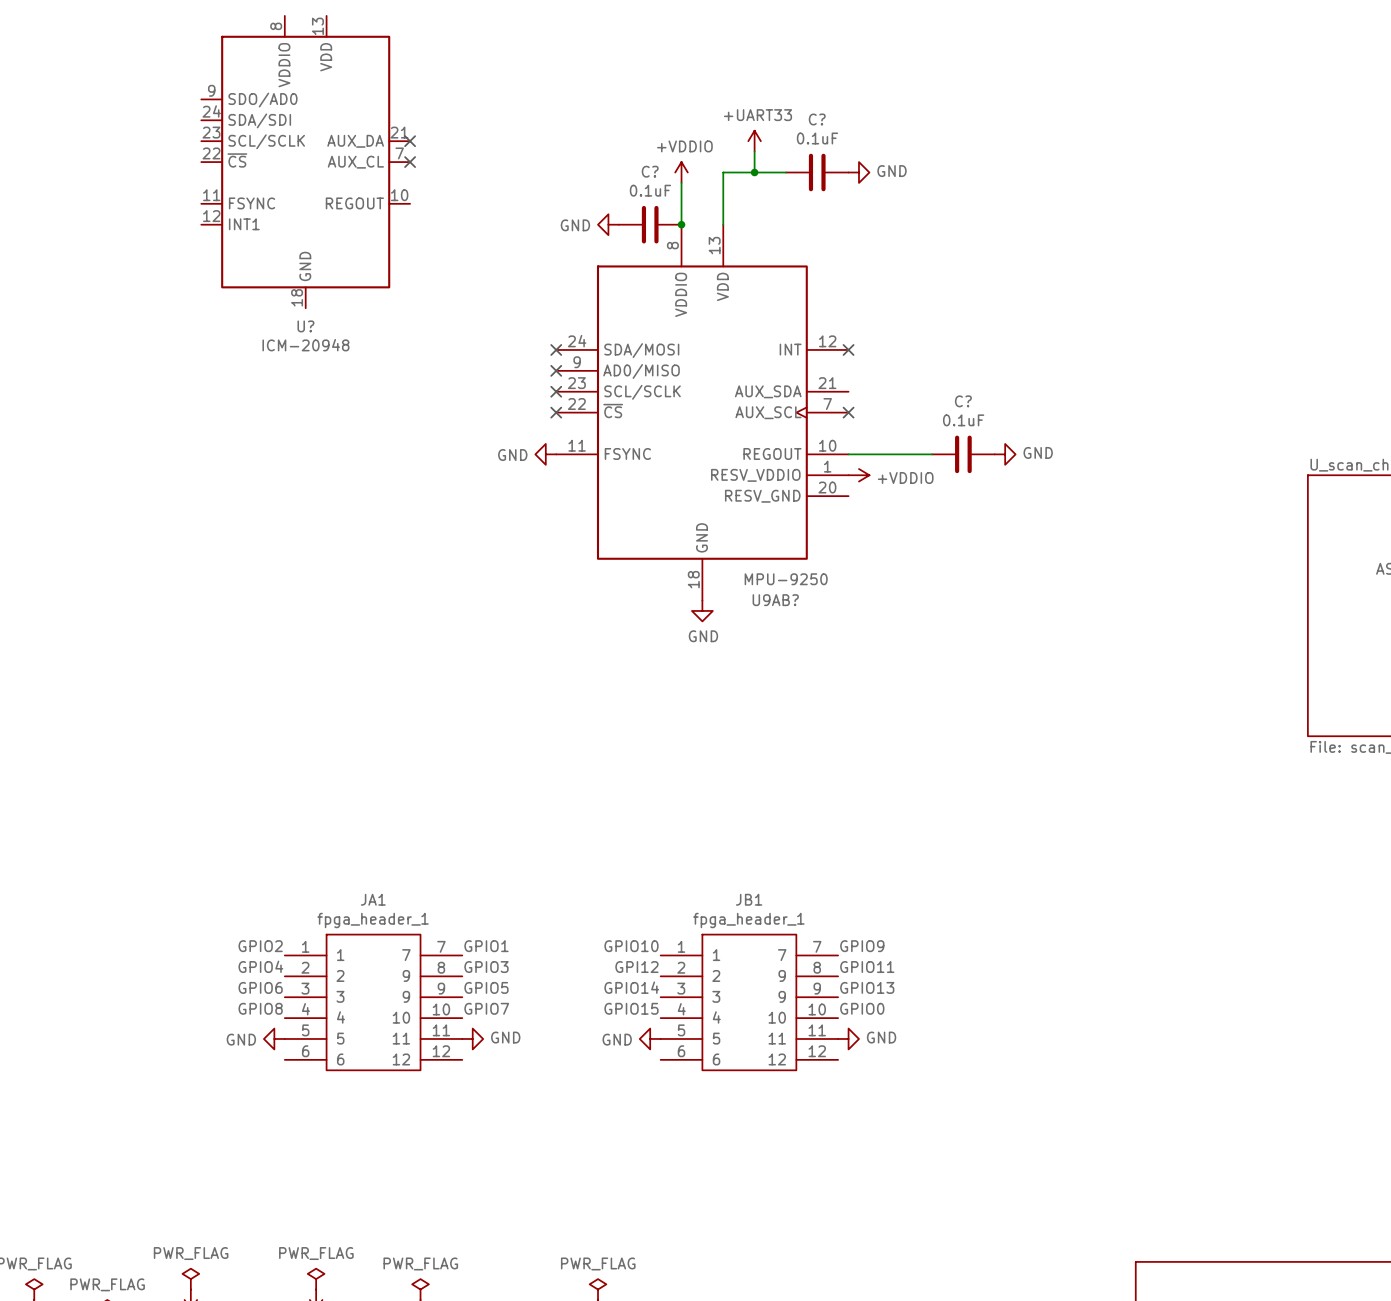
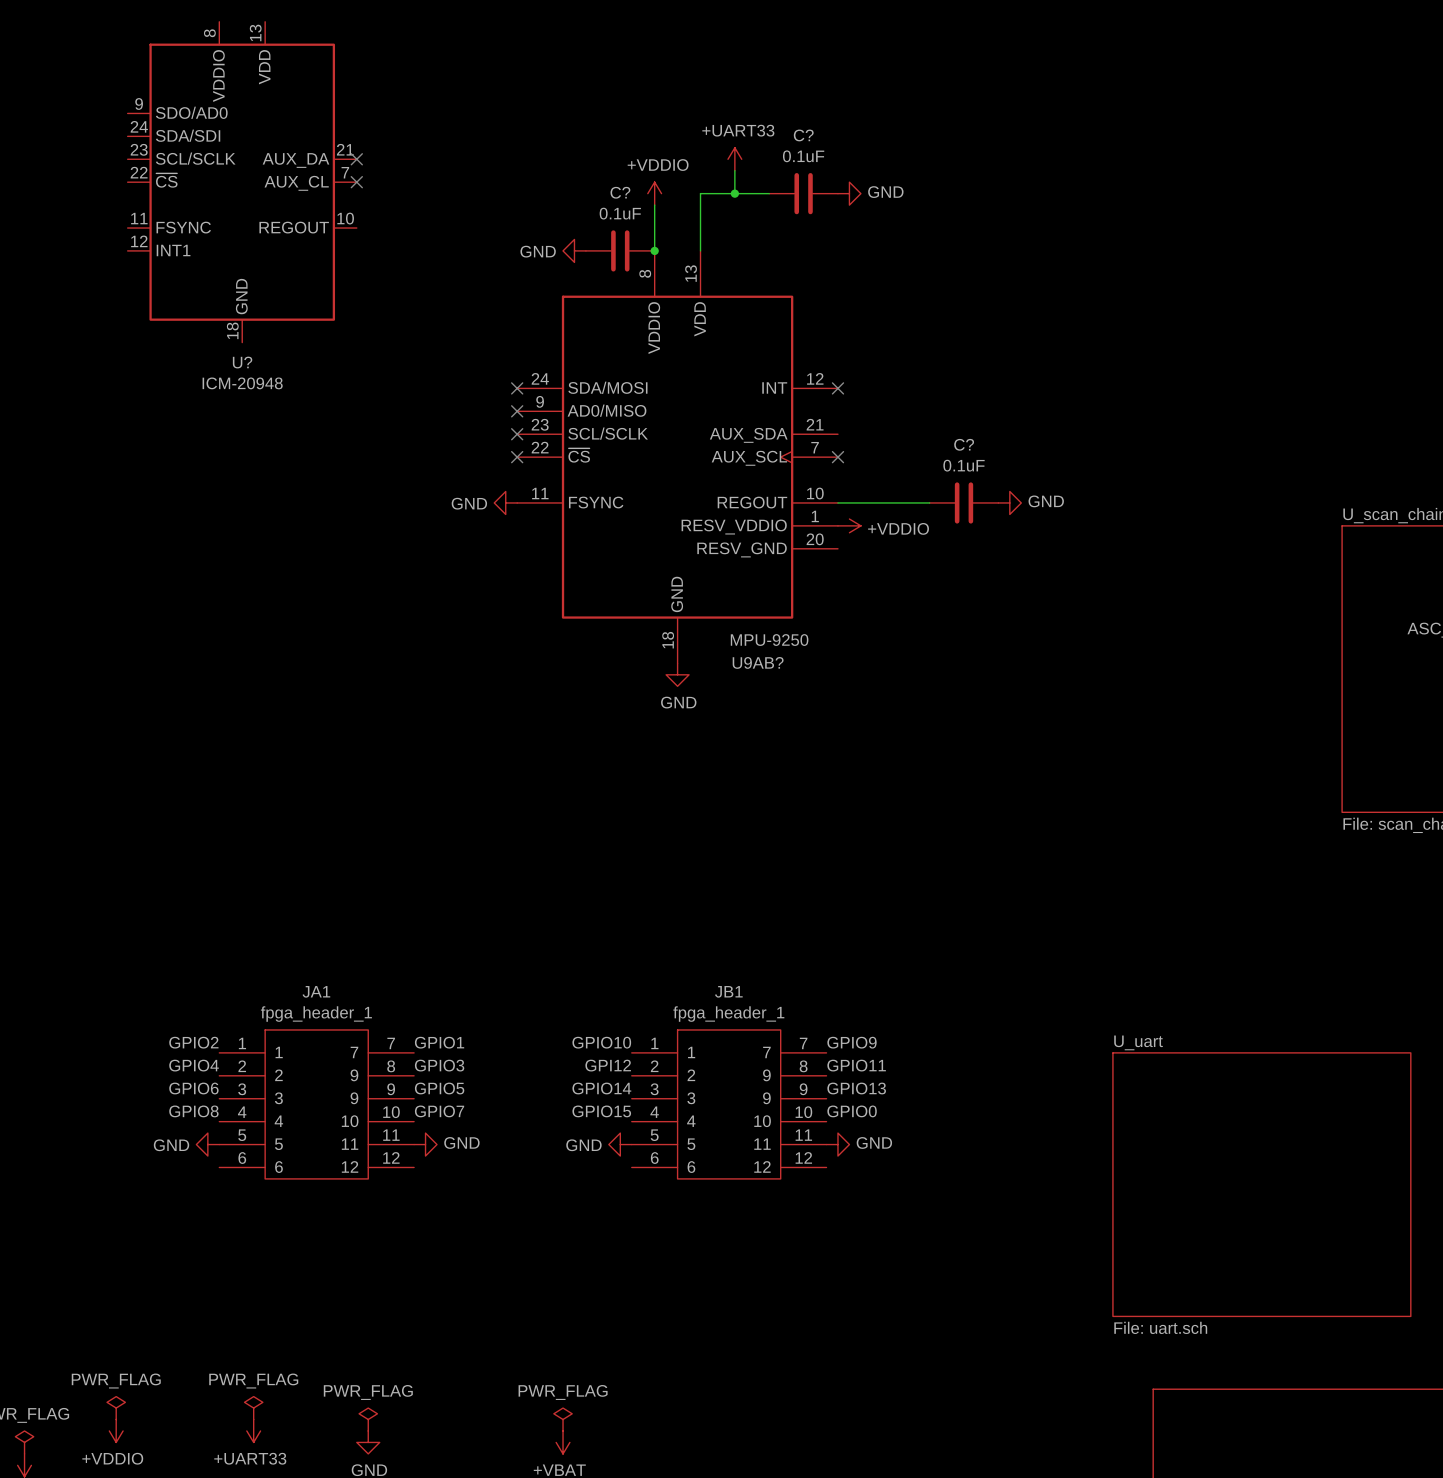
sheet U_uart: none -> File: uart.sch (1261, 1184)

